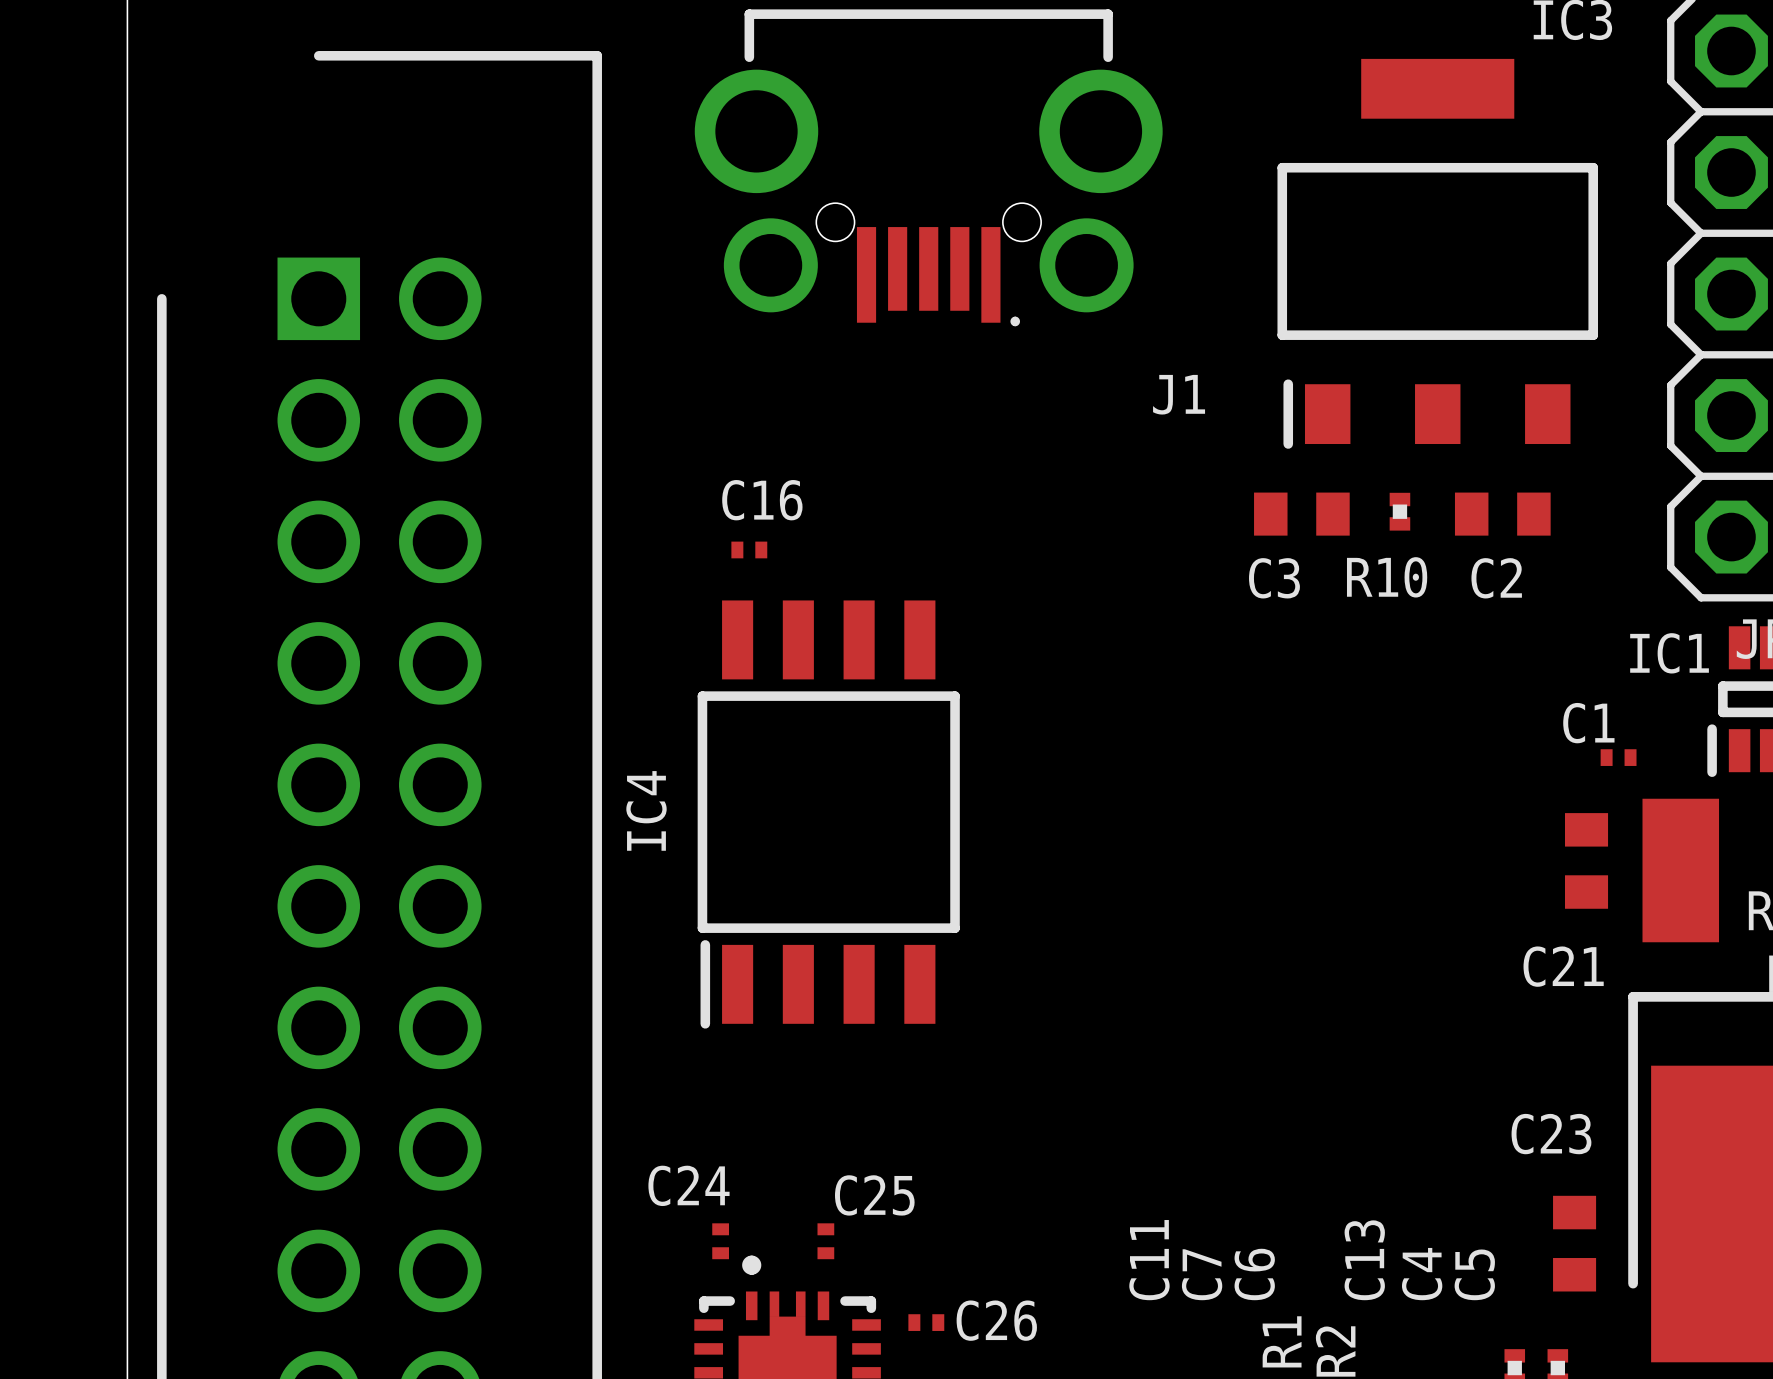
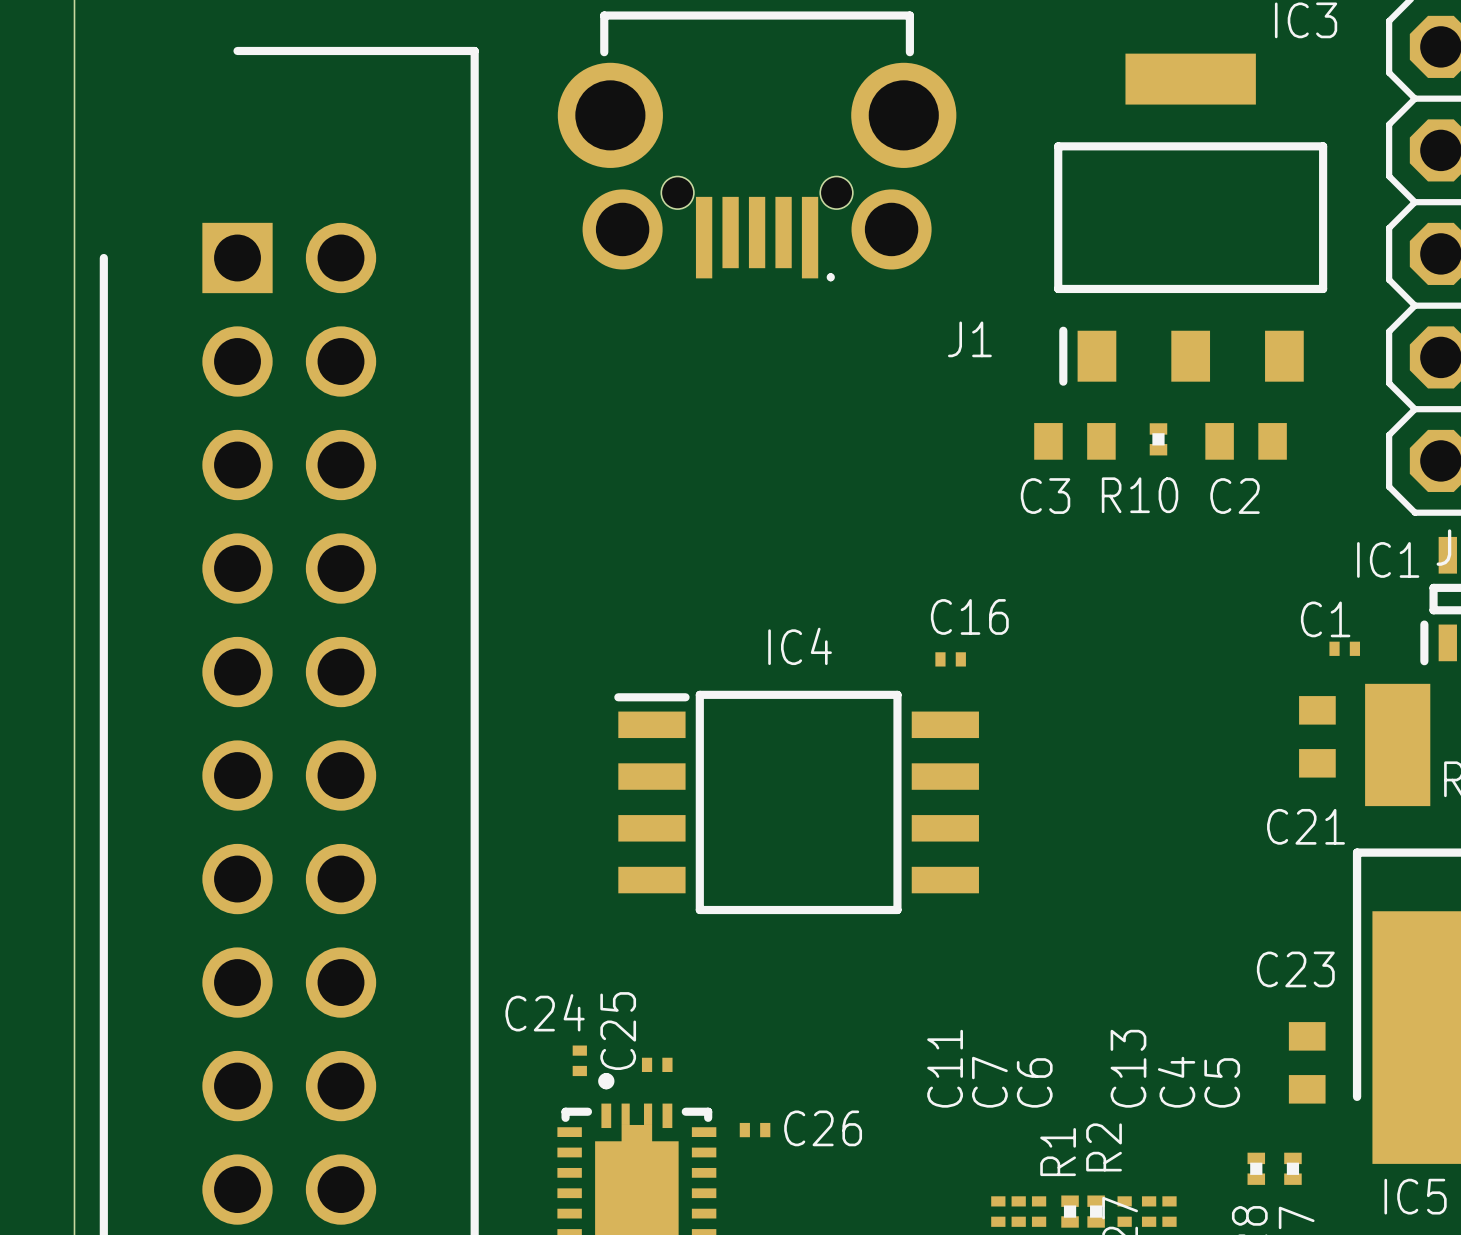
C16 position: (749, 549) -> (950, 659)
IC4 rotation: 0° (828, 814) -> 90° clockwise (796, 802)
C25 rotation: 0° (825, 1241) -> 90° clockwise (657, 1064)

